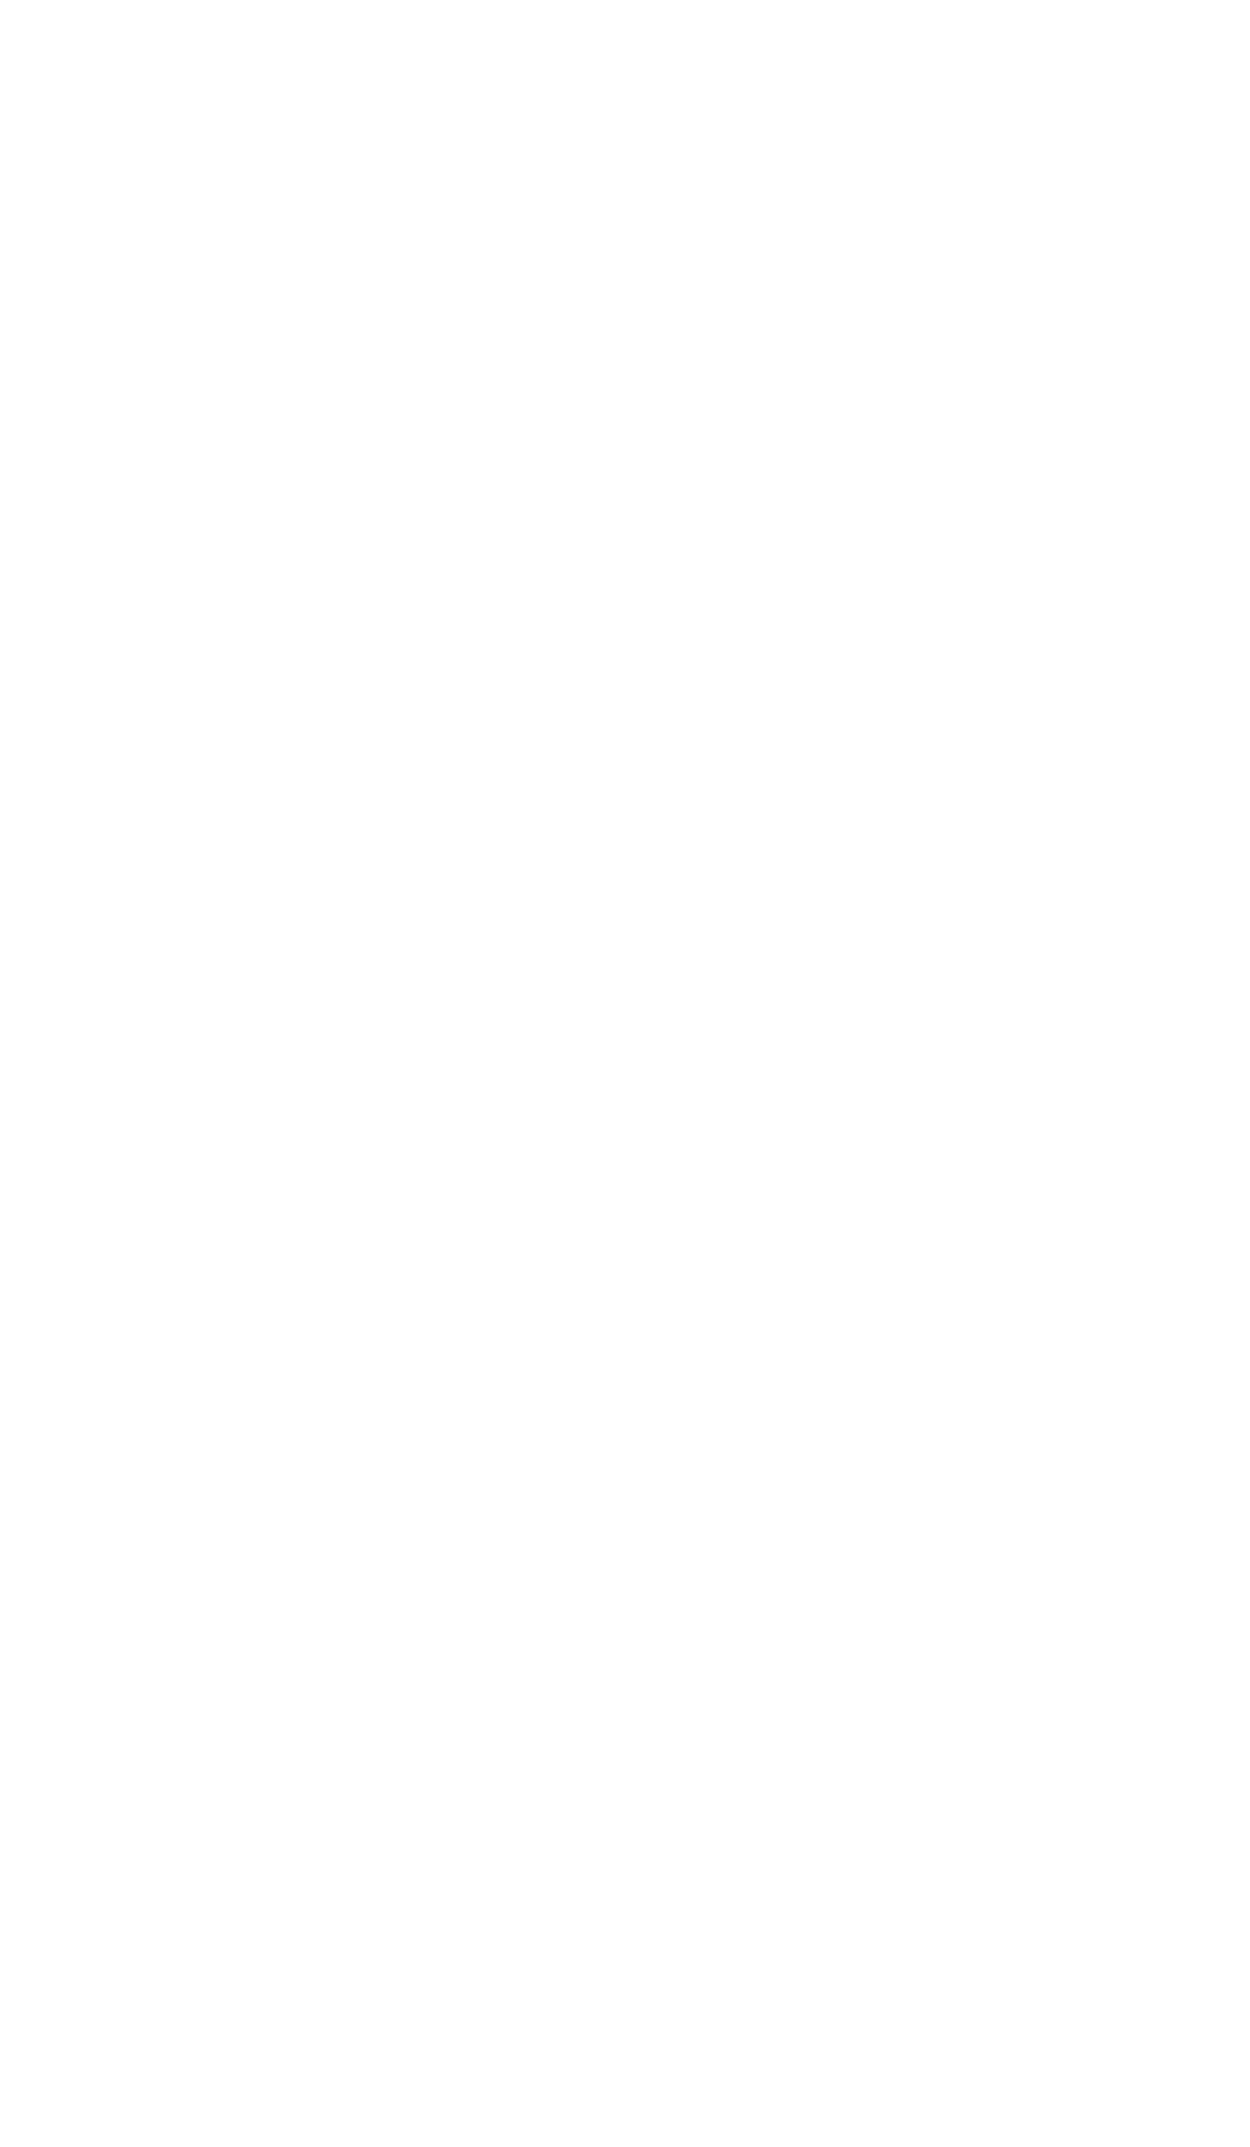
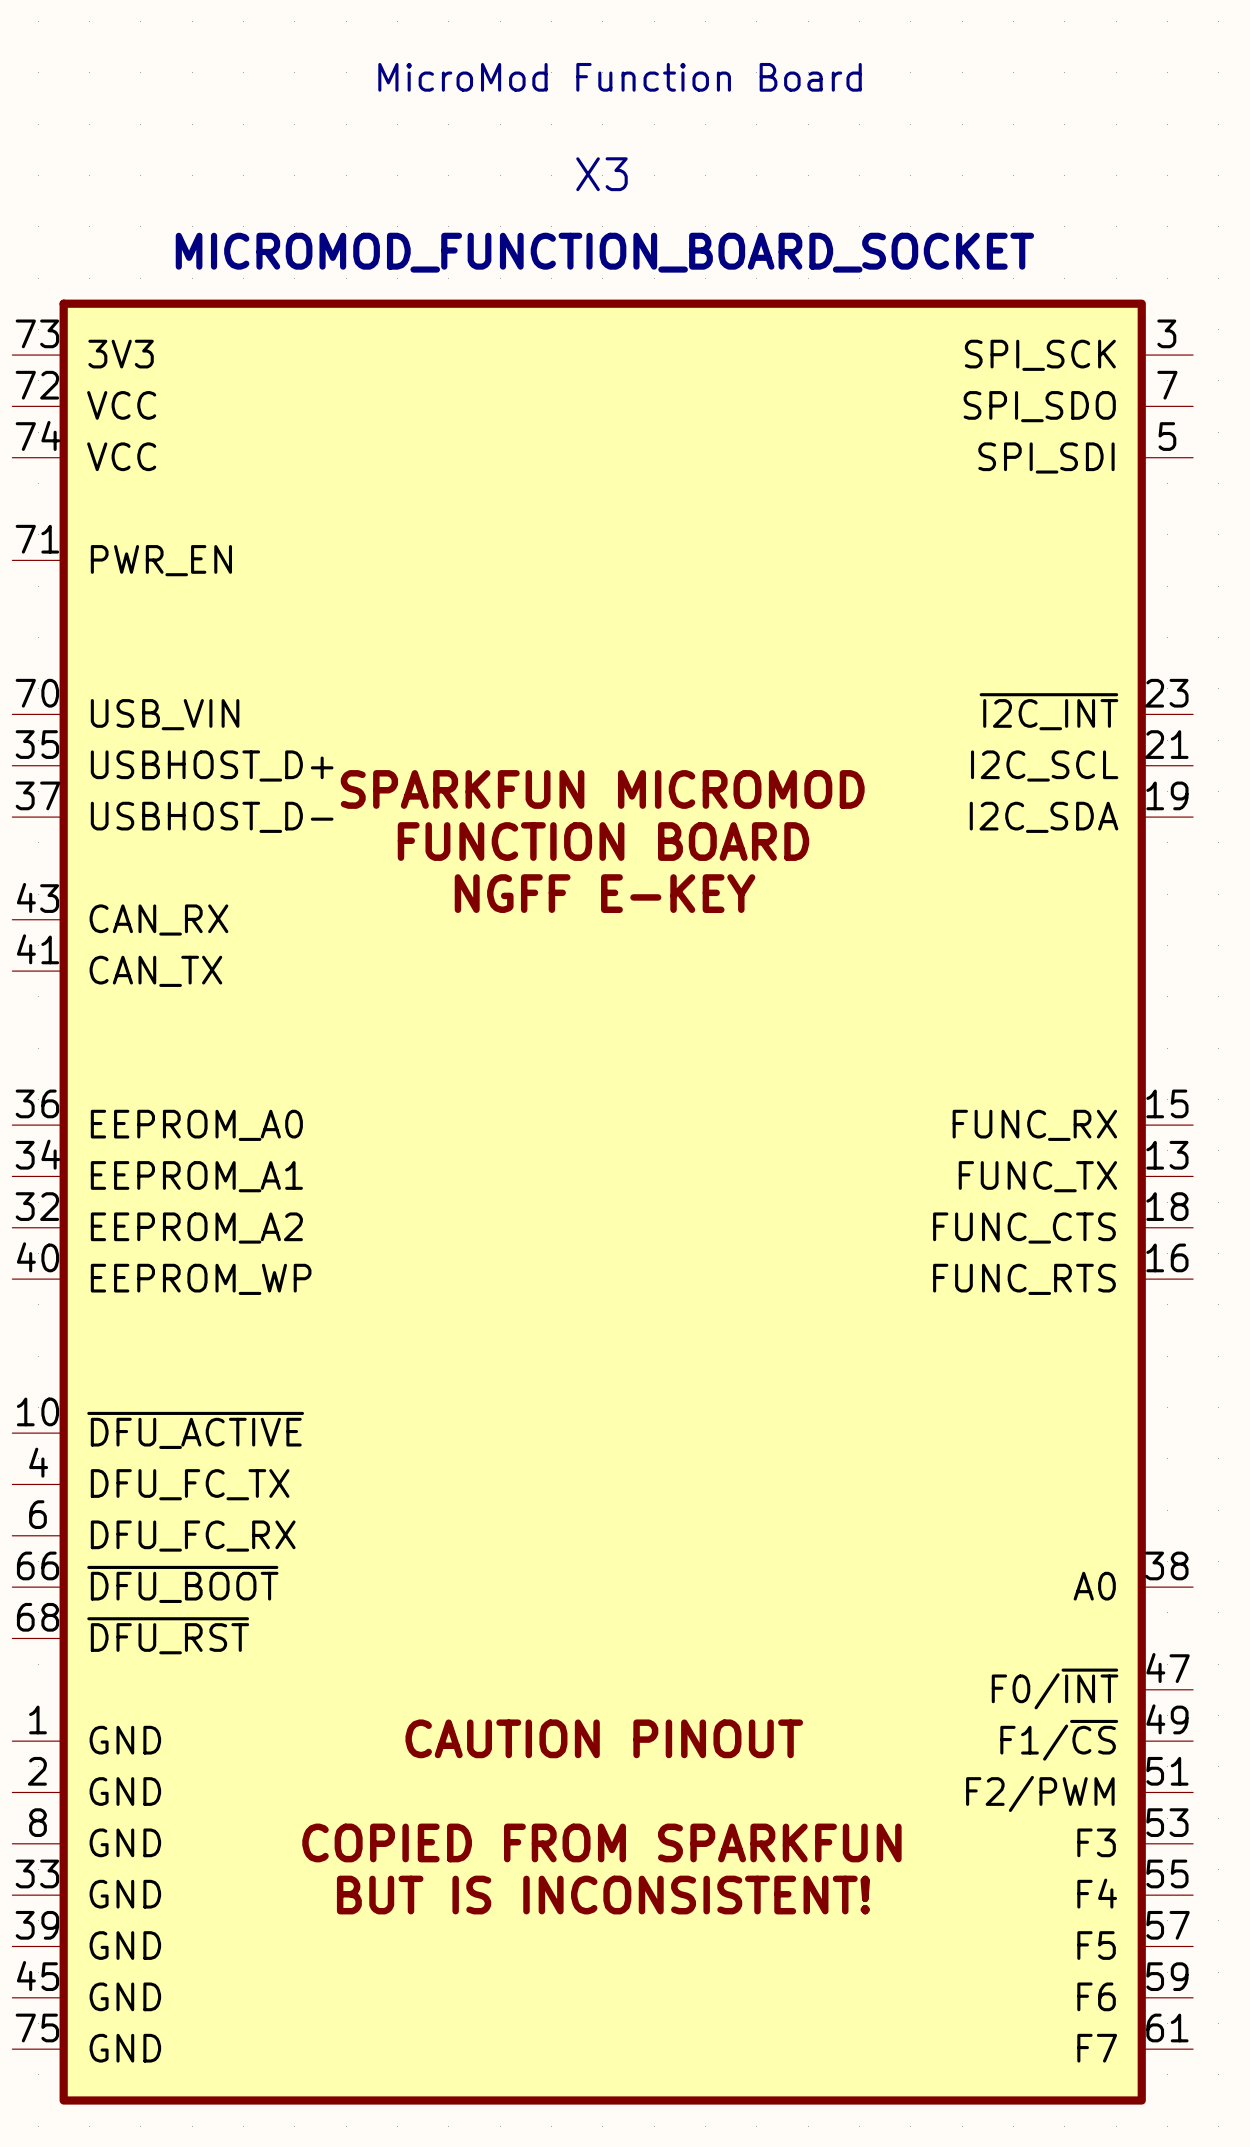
text: none -> MicroMod Function Board (620, 77)
X3: none -> MICROMOD_FUNCTION_BOARD_SOCKET (602, 1202)

